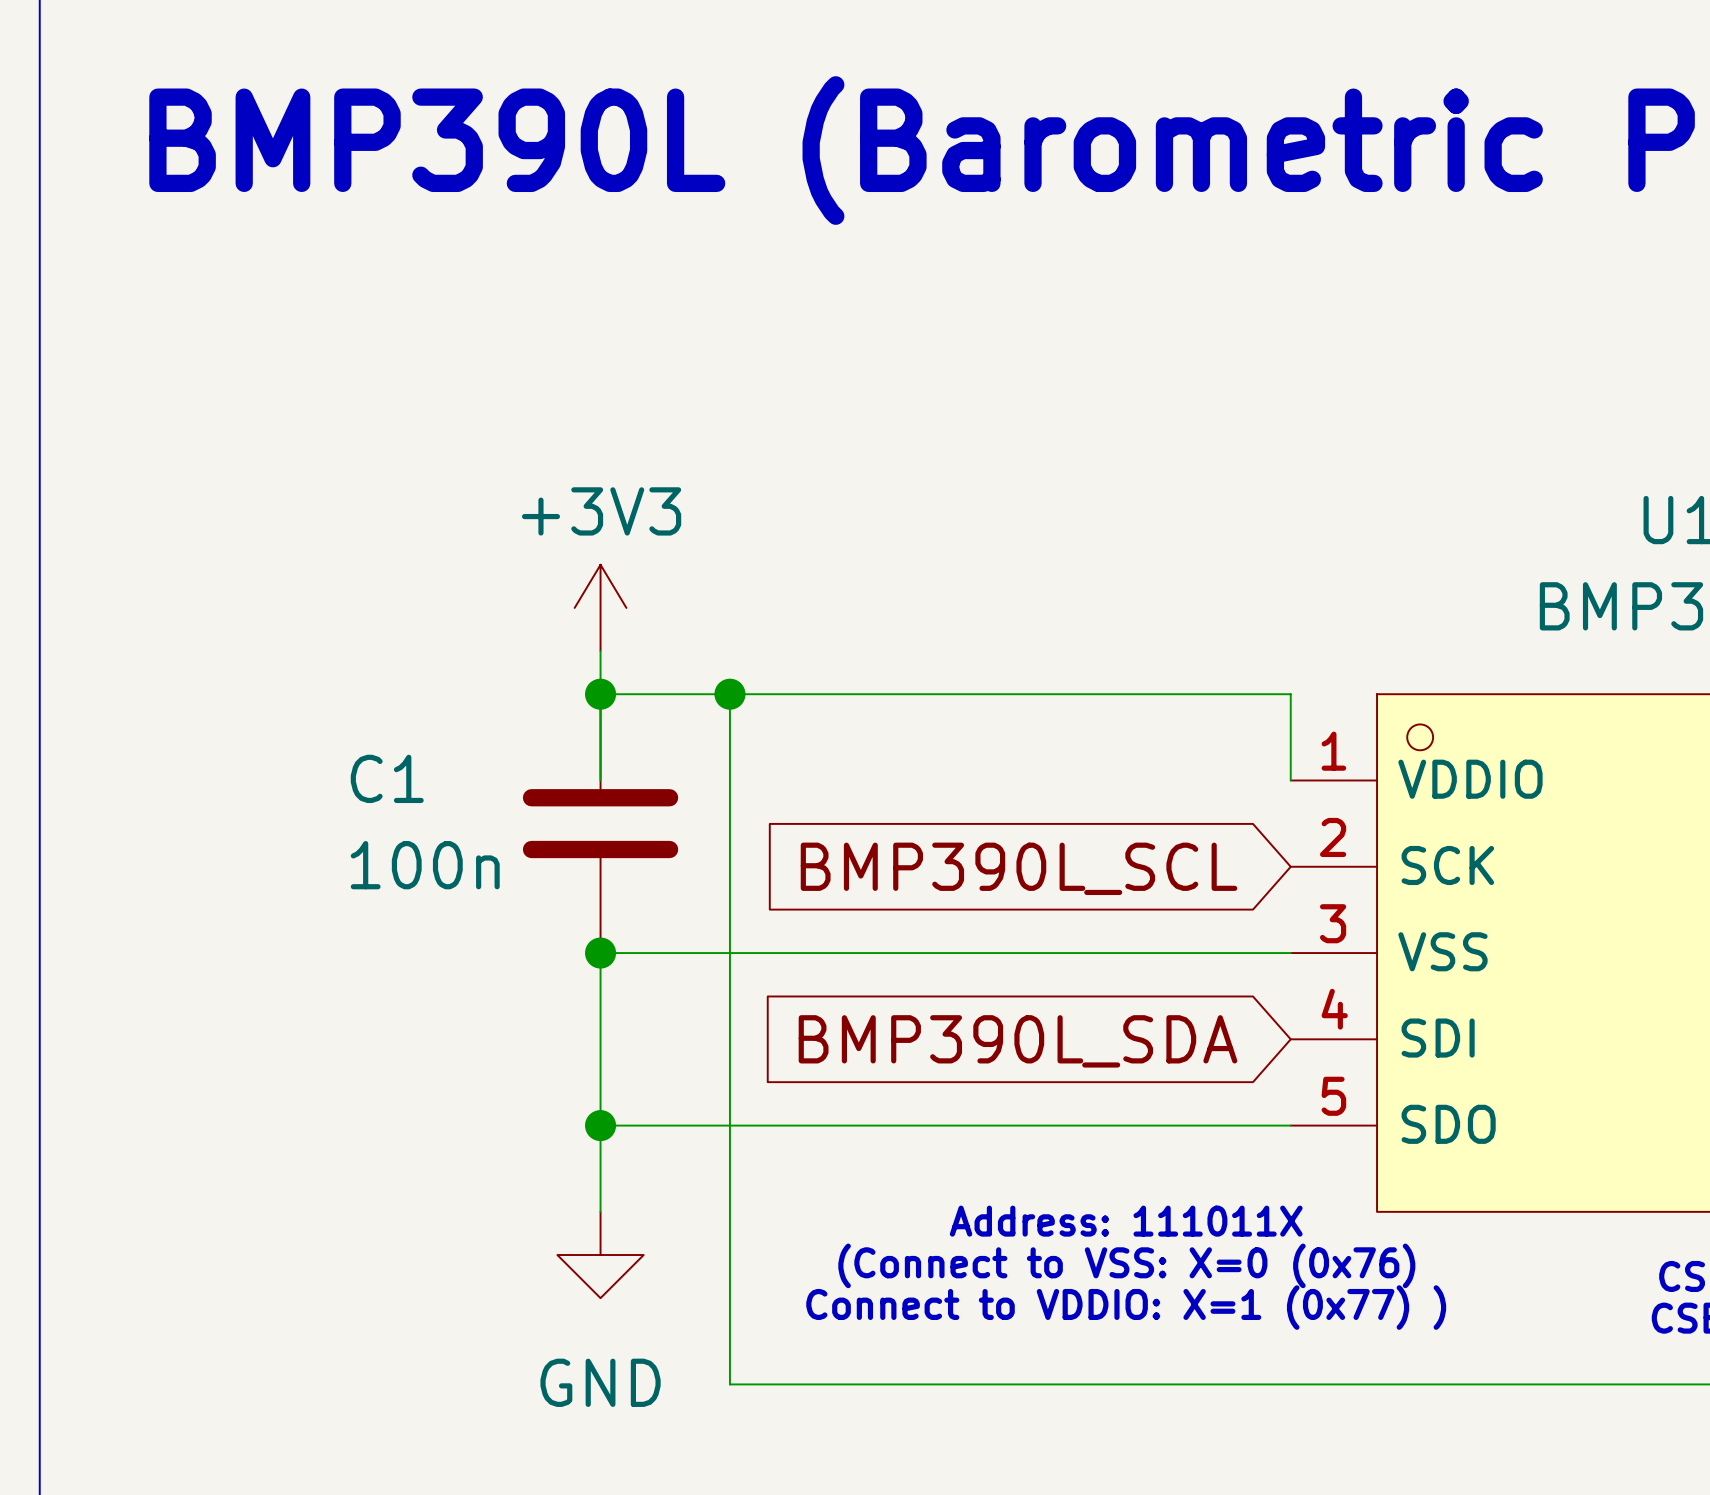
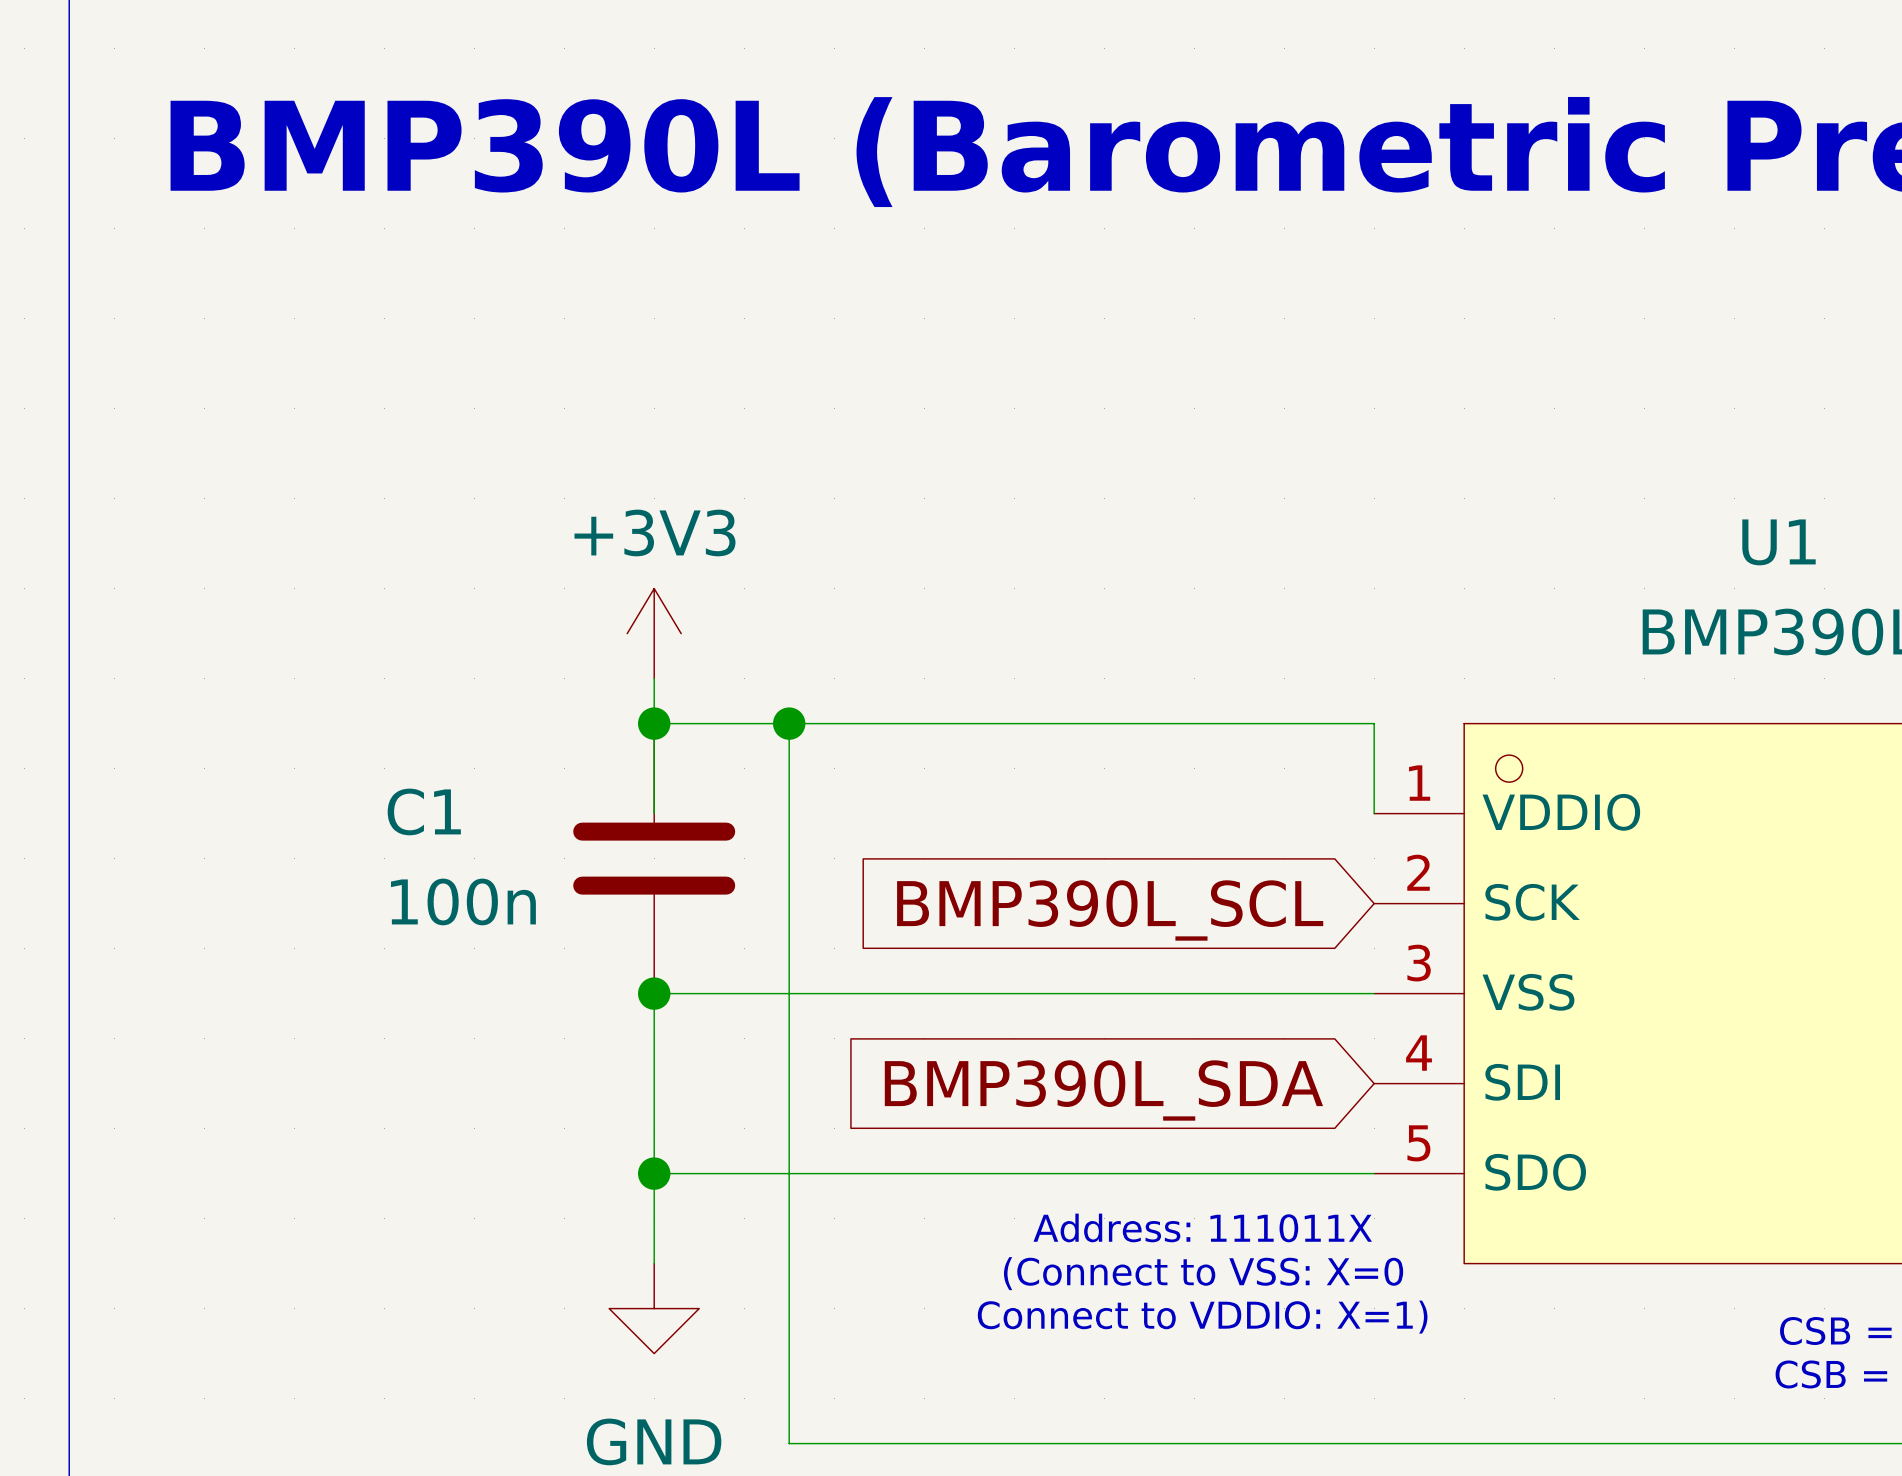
text: none -> Address: 111011X (1202, 1227)
text: Address: 111011X (1126, 1221) -> (Connect to VSS: X=0 (1203, 1273)
text: (Connect to VSS: X=0 (0x76) (1126, 1265) -> Connect to VDDIO: X=1) (1202, 1317)
text: Connect to VDDIO: X=1 (0x77) ) (1126, 1307) -> none

